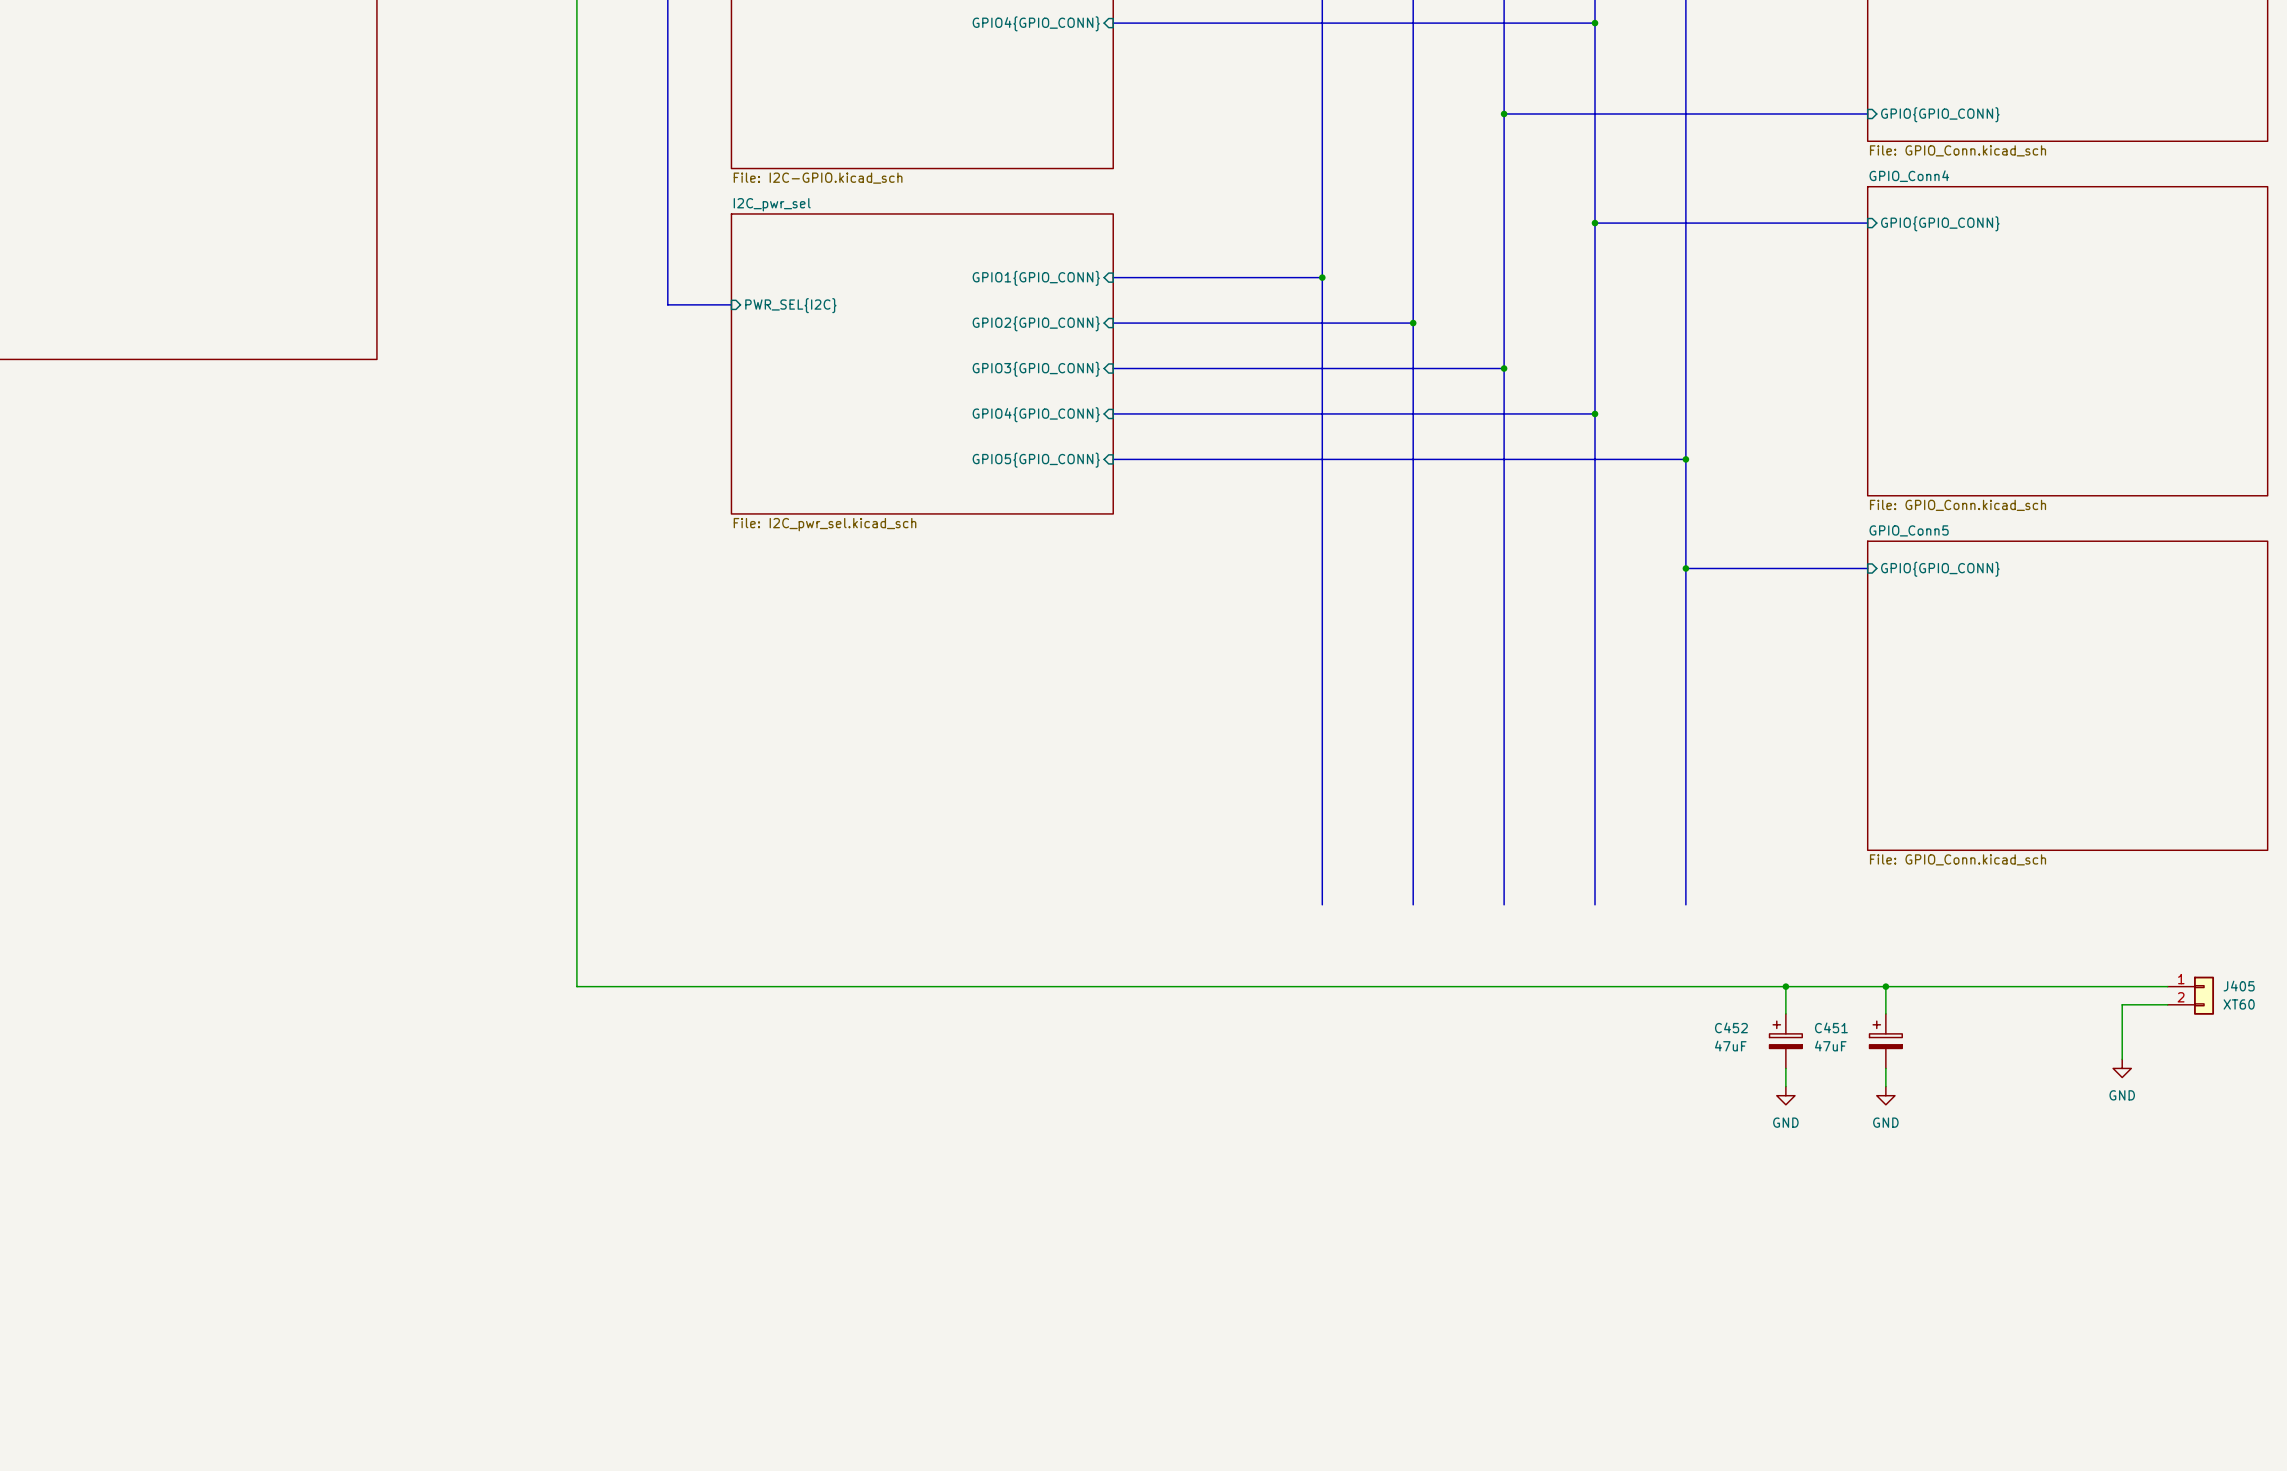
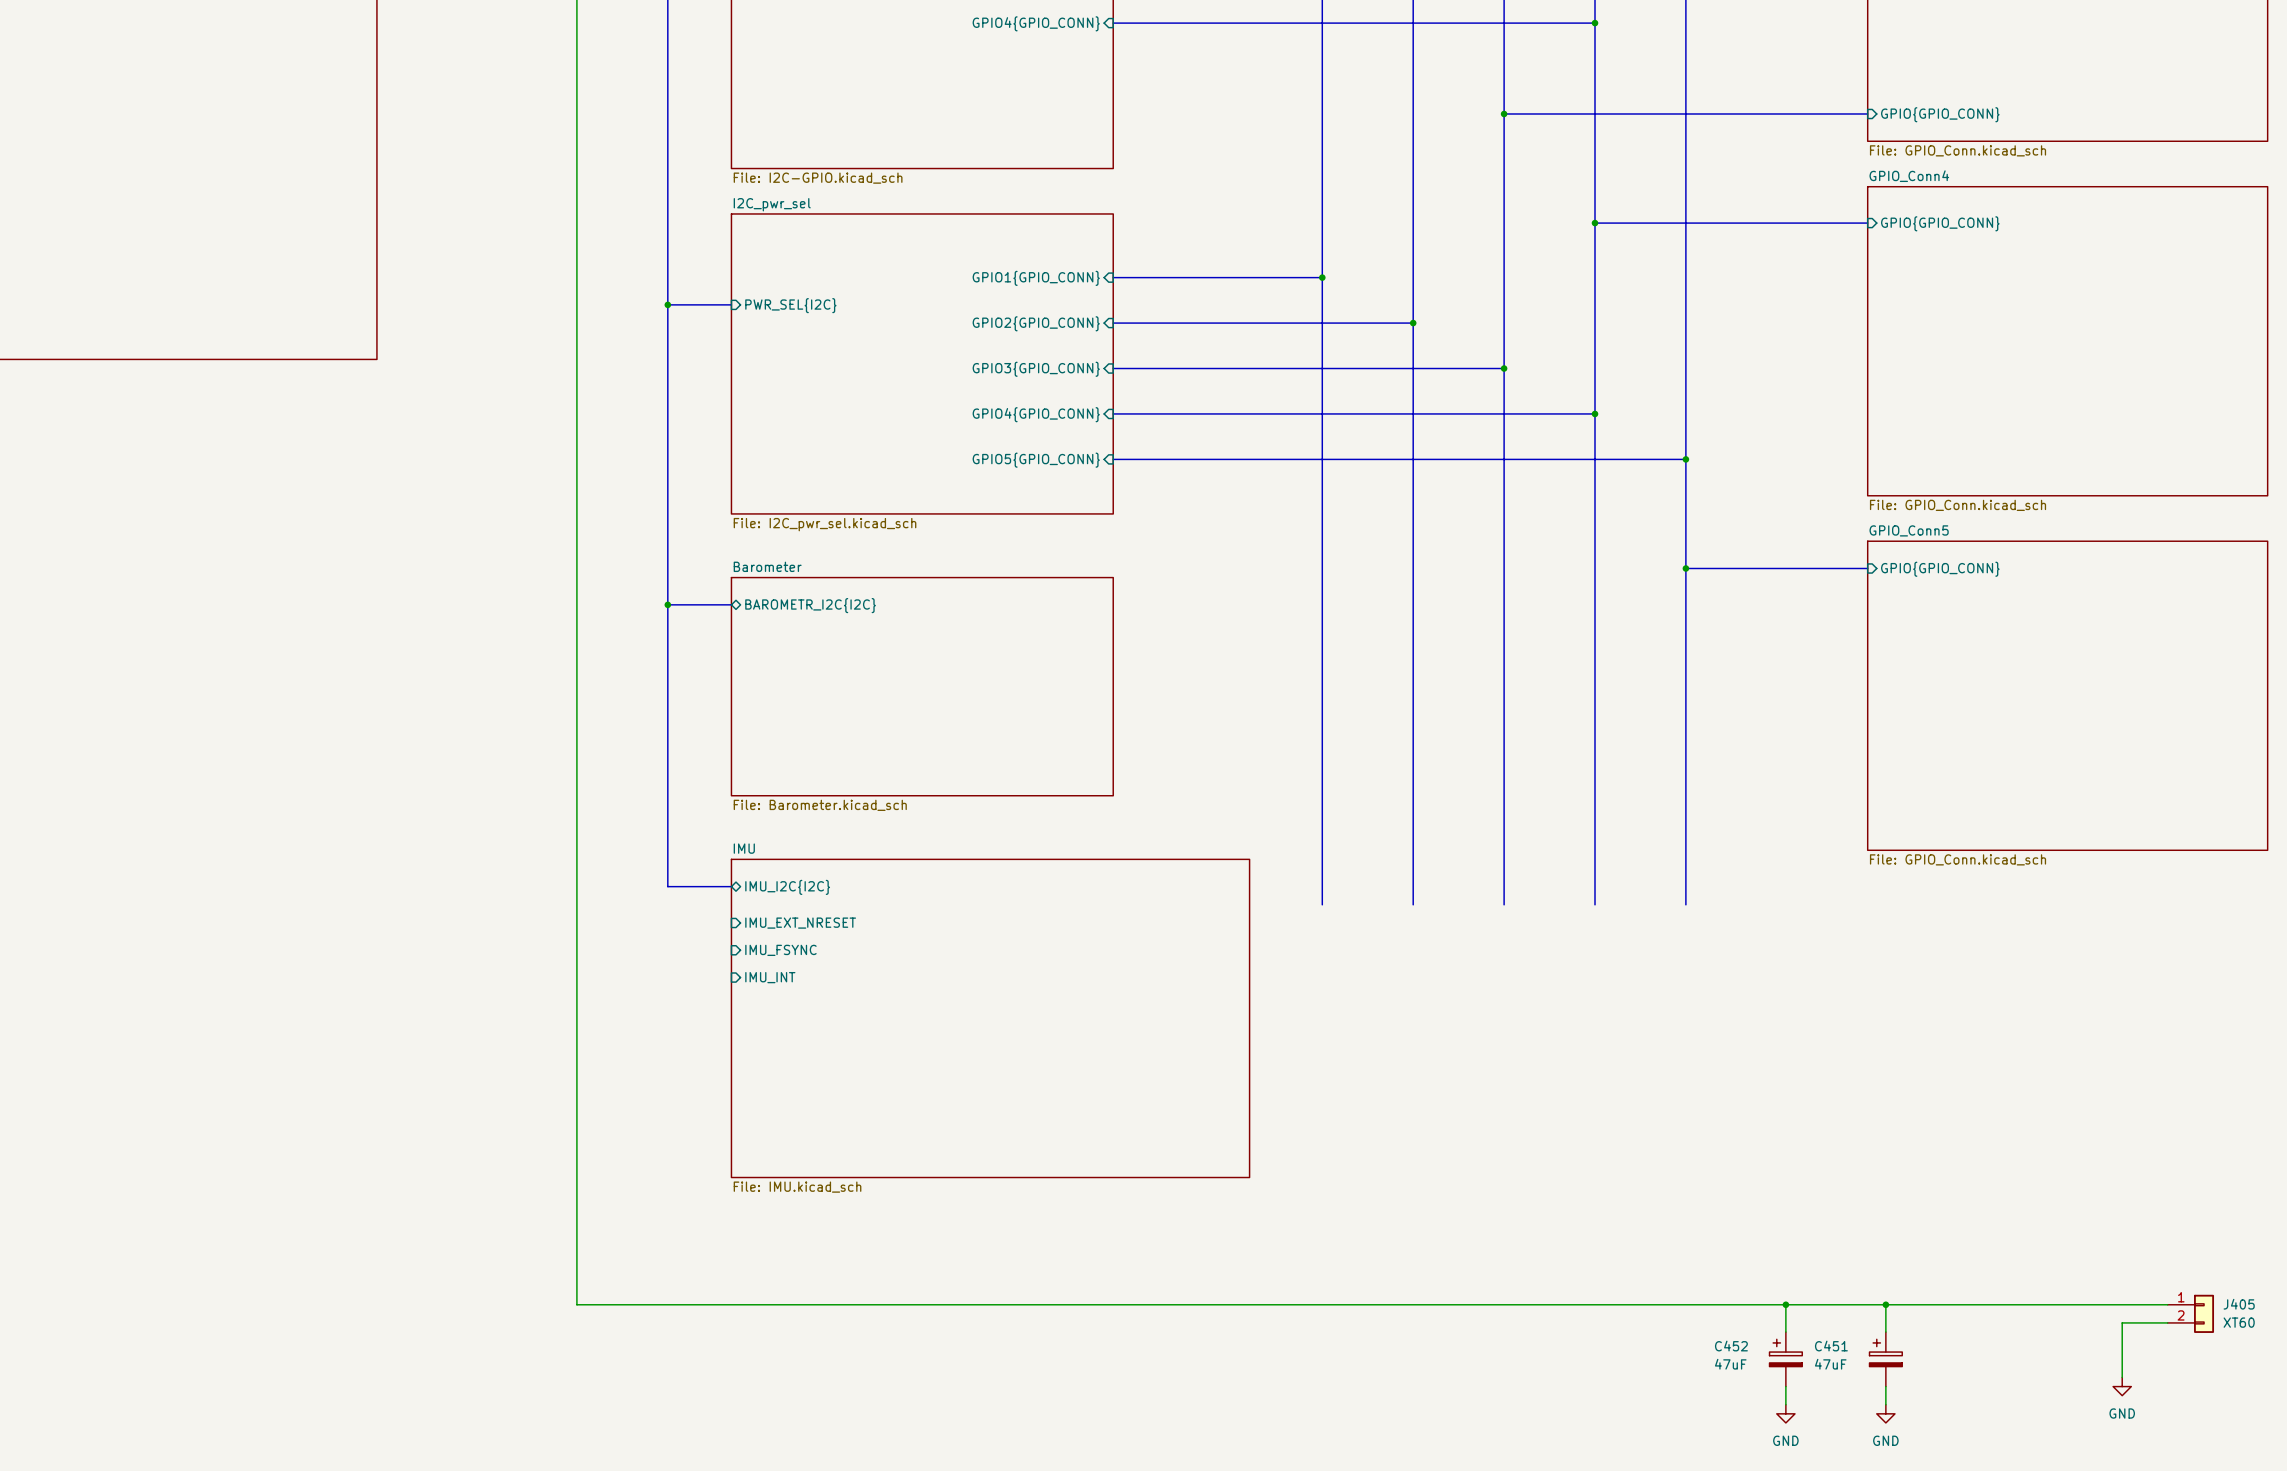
bus: none -> (667, 304) (667, 886) (731, 886)
junction: none -> (667, 304)
bus: none -> (667, 604) (731, 604)
junction: none -> (667, 604)
sheet pin: none -> BAROMETR_I2C{I2C} (810, 605)
sheet Barometer: none -> File: Barometer.kicad_sch (922, 686)
sheet pin: none -> IMU_I2C{I2C} (787, 887)
sheet pin: none -> IMU_EXT_NRESET (800, 923)
sheet pin: none -> IMU_FSYNC (780, 950)
sheet pin: none -> IMU_INT (770, 977)
wire: (576, 986) (2167, 986) -> (576, 986) (576, 1304) (2167, 1304)
wire: (1785, 986) (1785, 1013) -> none
junction: (1785, 986) -> none
wire: (1885, 986) (1885, 1013) -> none
junction: (1885, 986) -> none
J405 position: (2190, 995) -> (2190, 1313)
wire: (2167, 1004) (2122, 1004) (2122, 1059) -> none
sheet IMU: none -> File: IMU.kicad_sch (990, 1018)
C452 position: (1785, 1041) -> (1785, 1359)
C451 position: (1885, 1041) -> (1885, 1359)
wire: (1785, 1068) (1785, 1086) -> none
wire: (1885, 1068) (1885, 1086) -> none
power symbol: GND (2122, 1068) -> none
power symbol: GND (1785, 1095) -> none
power symbol: GND (1885, 1095) -> none
wire: none -> (1785, 1304) (1785, 1332)
junction: none -> (1785, 1304)
wire: none -> (1885, 1304) (1885, 1332)
junction: none -> (1885, 1304)
wire: none -> (2167, 1322) (2122, 1322) (2122, 1377)
wire: none -> (1785, 1386) (1785, 1404)
wire: none -> (1885, 1386) (1885, 1404)
power symbol: none -> GND (2122, 1386)
power symbol: none -> GND (1785, 1413)
power symbol: none -> GND (1885, 1413)

